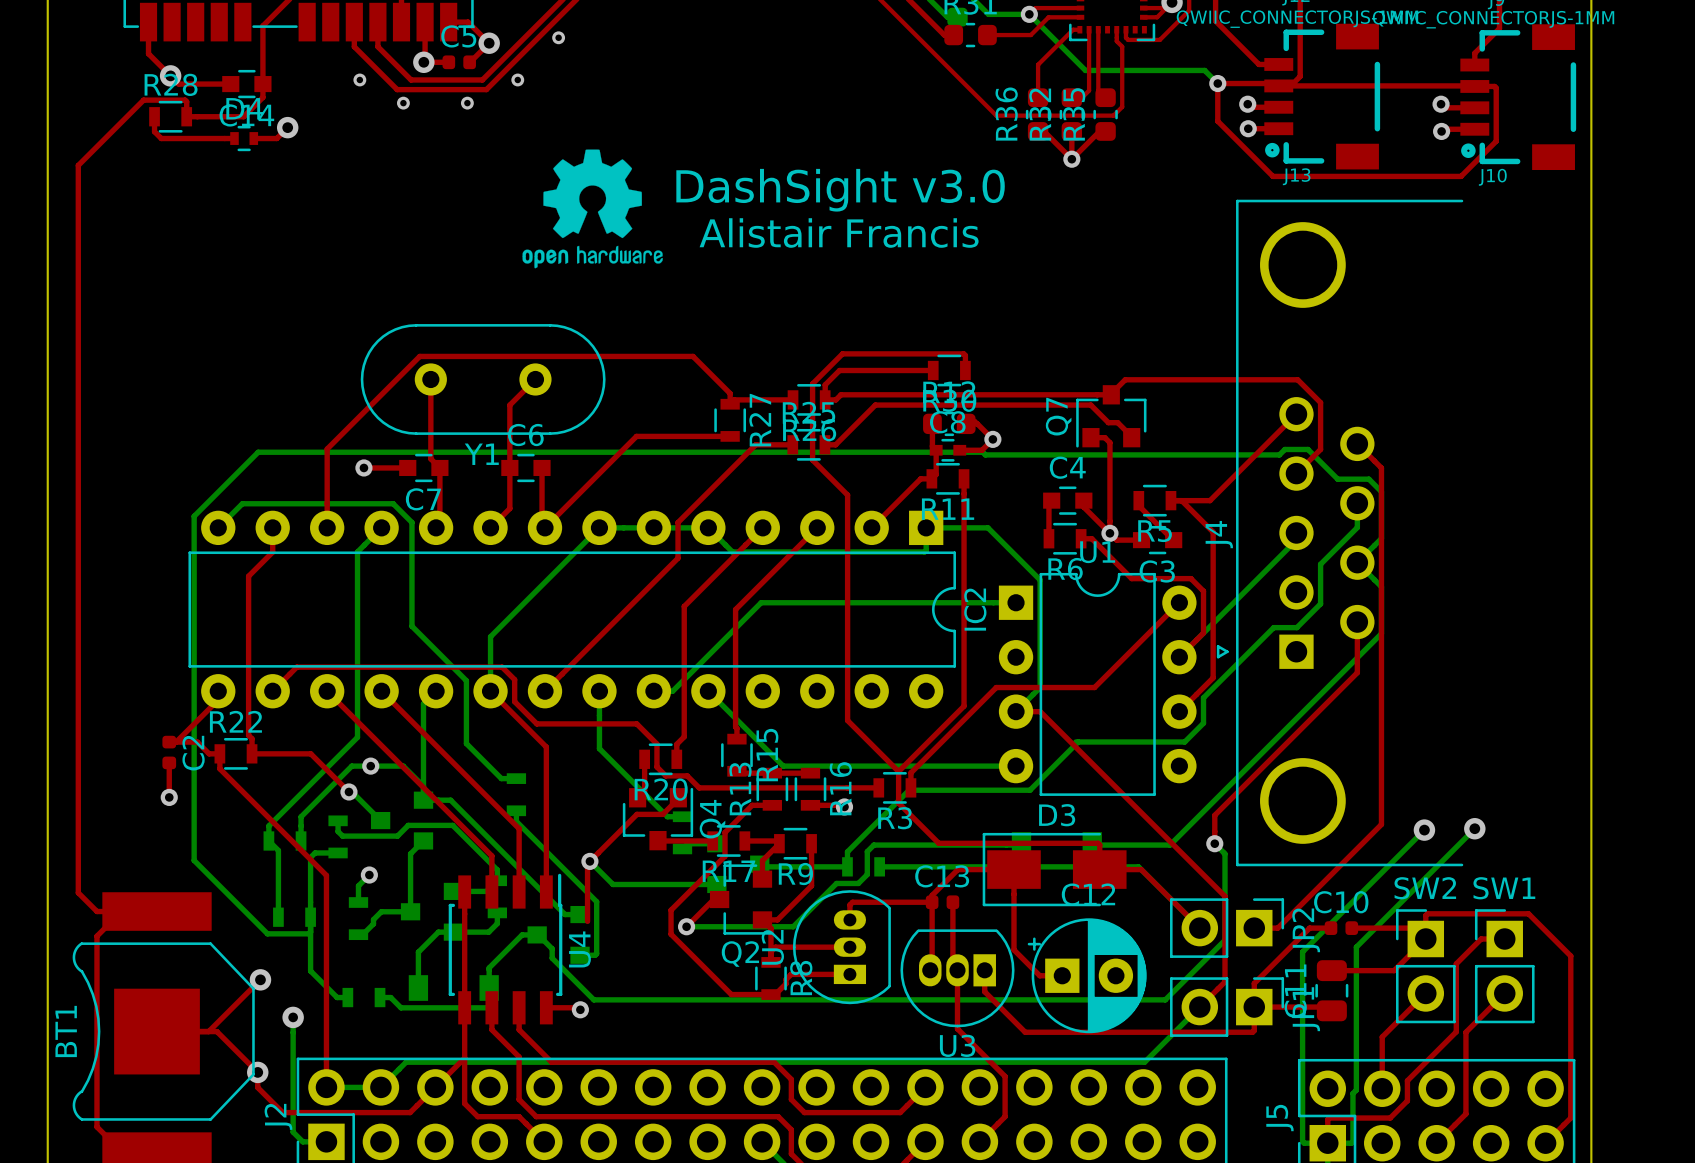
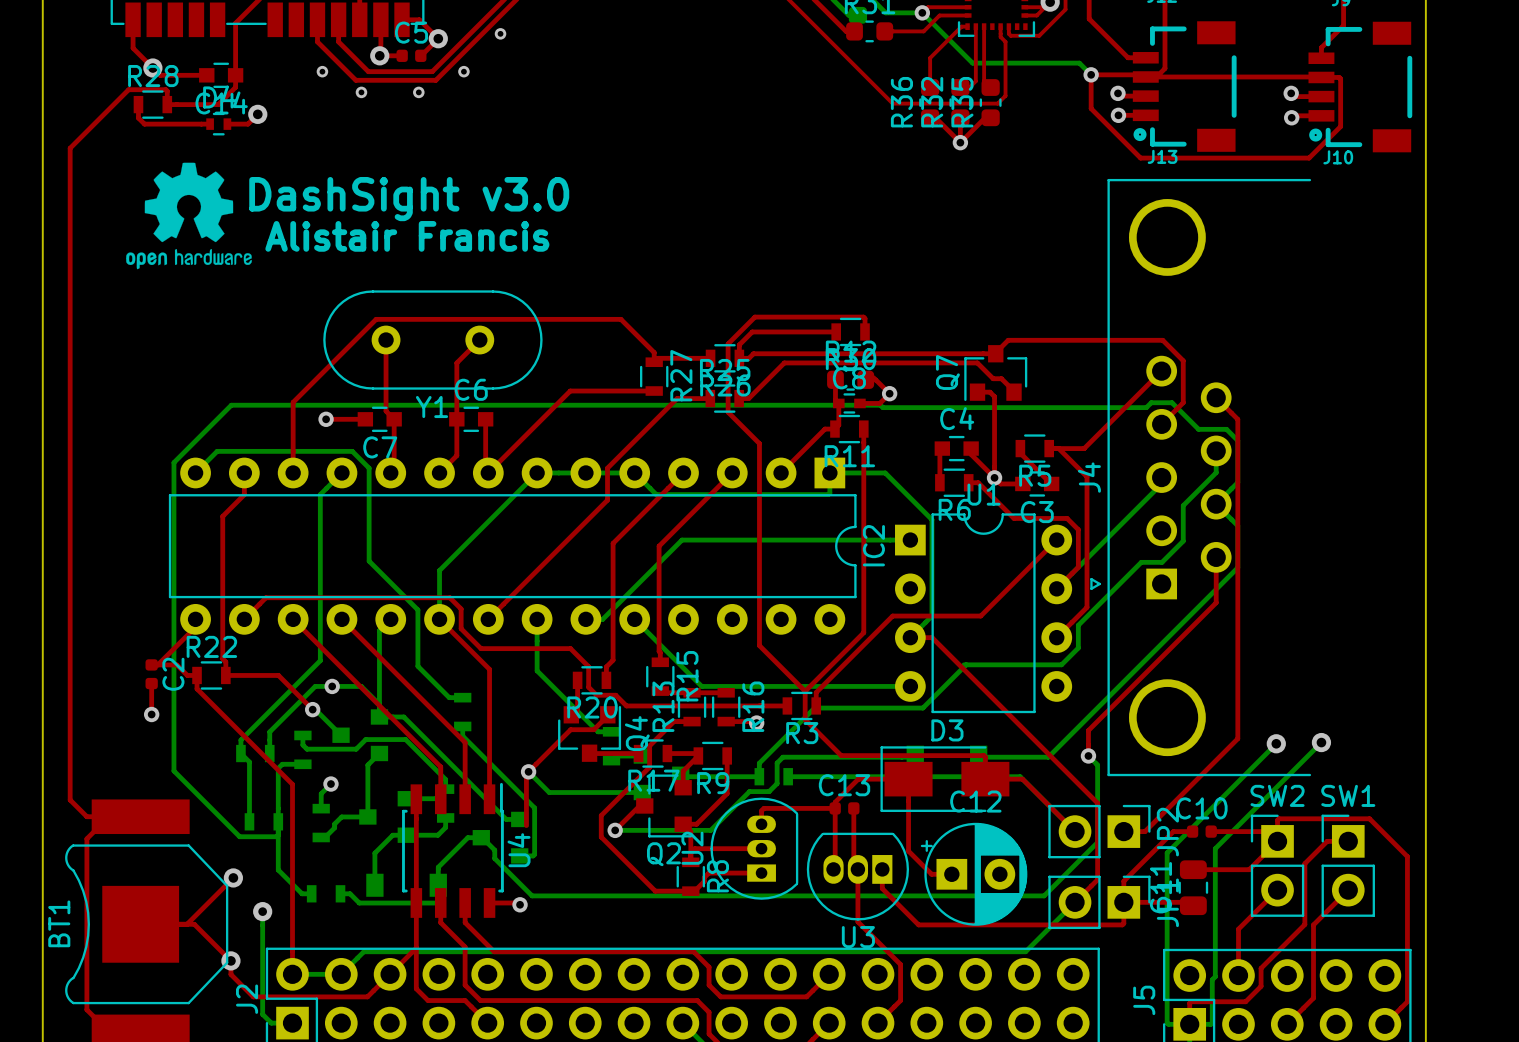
J13 value: QWIIC_CONNECTORJS-1MM (1297, 19) -> none
J10 value: QWIIC_CONNECTORJS-1MM (1493, 19) -> none
text position: DashSight v3.0 (840, 190) -> DashSight v3.0 (409, 199)
drawing position: (592, 208) -> (188, 215)
text position: Alistair Francis (839, 233) -> Alistair Francis (407, 236)

